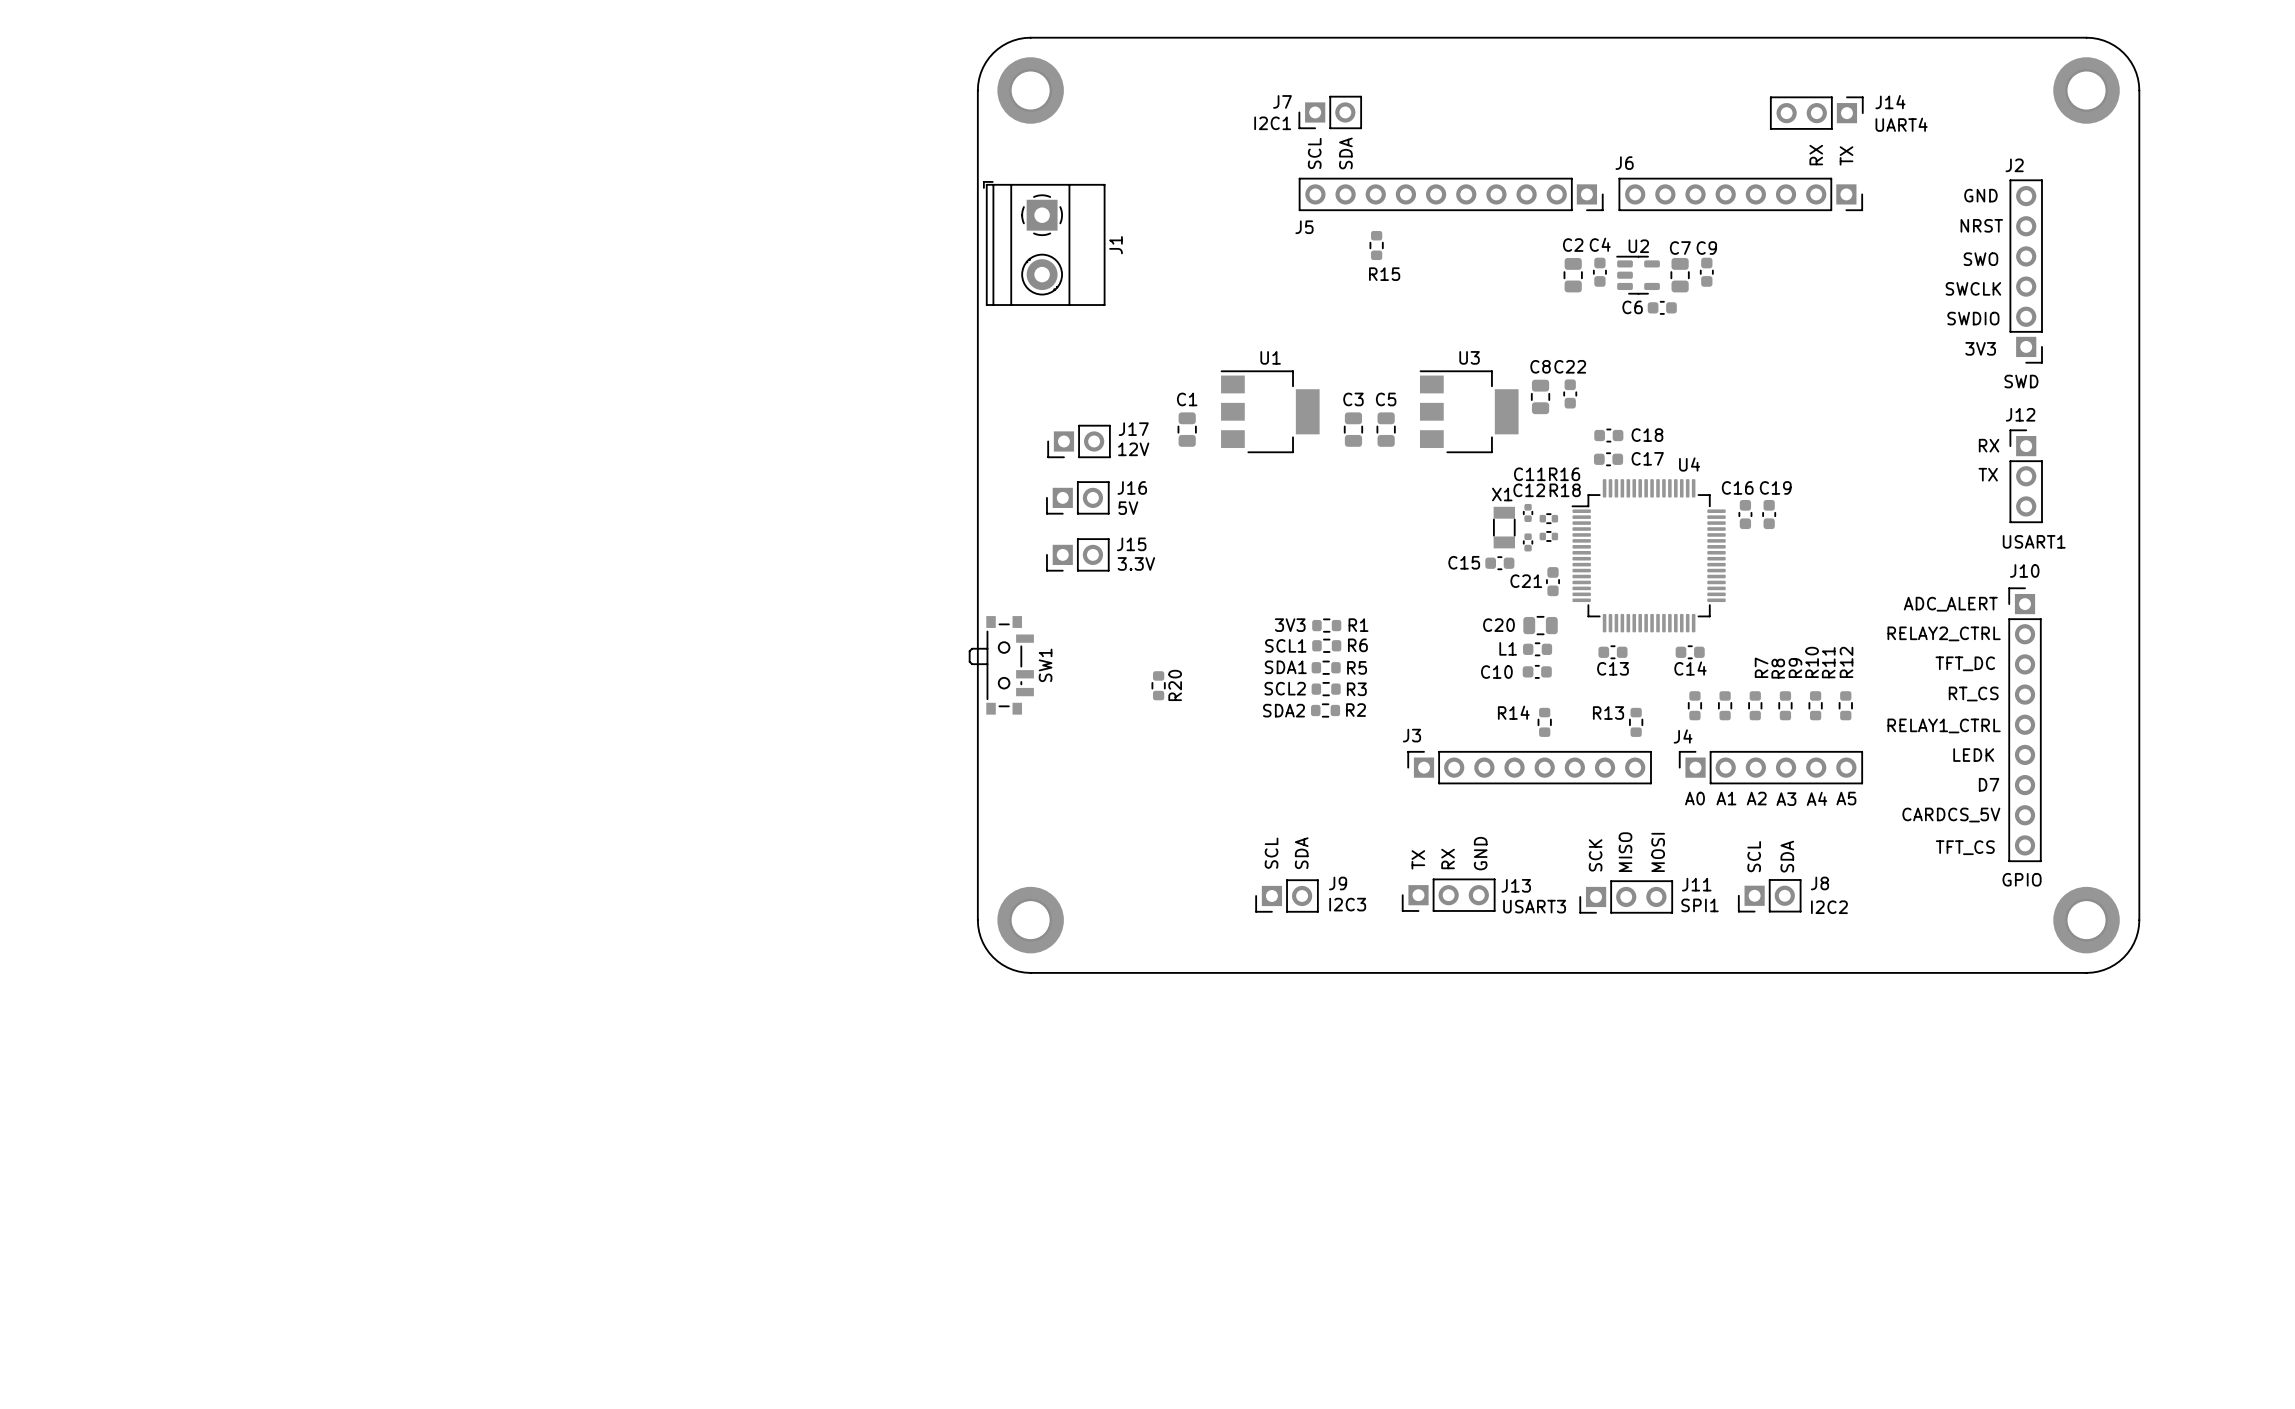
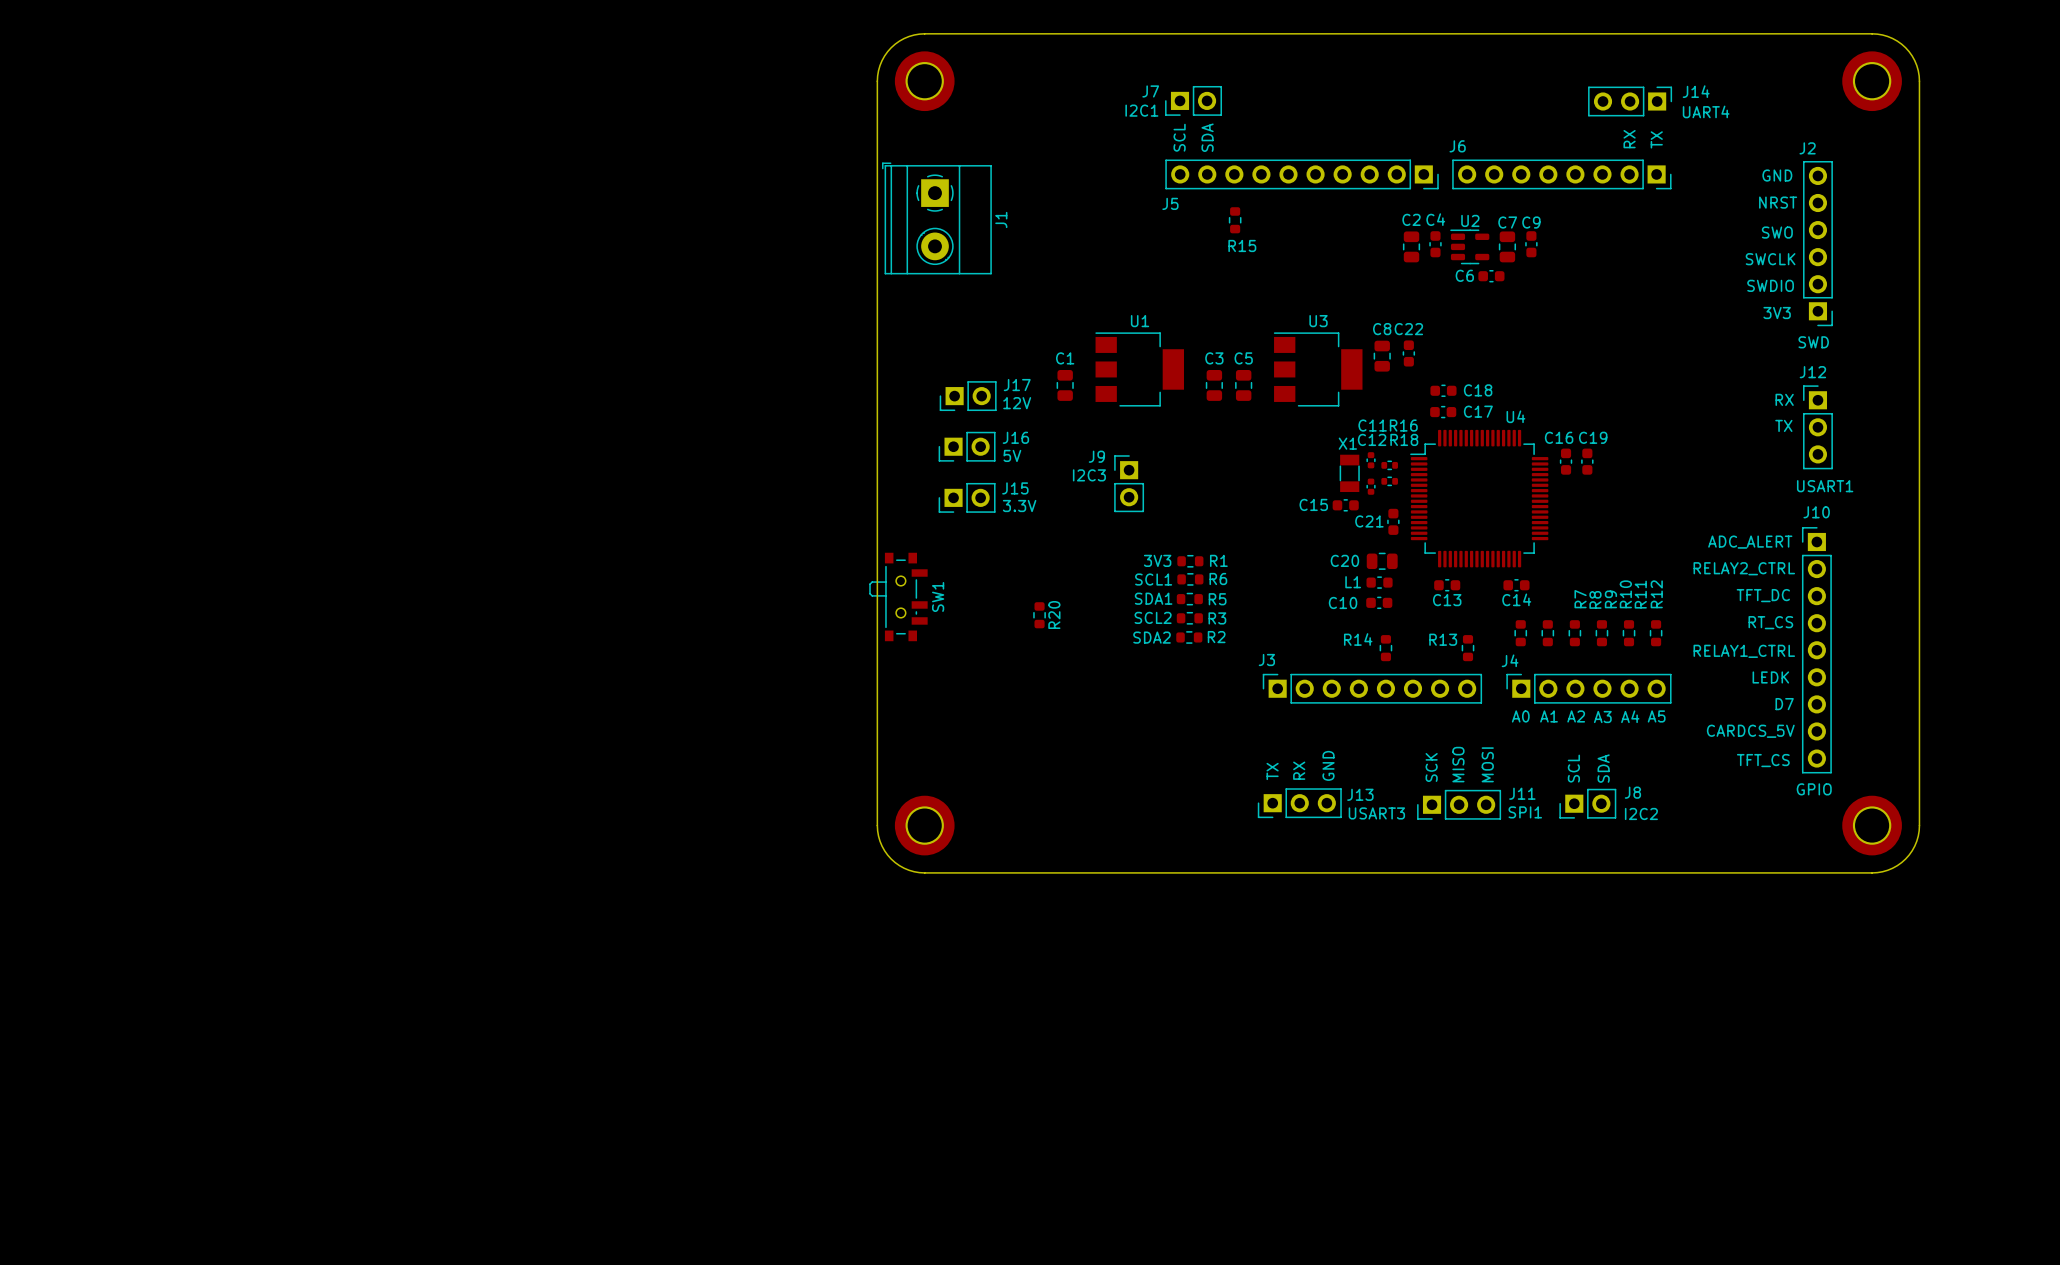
J9 footprint: [1255, 879, 1319, 913] -> [1114, 455, 1144, 513]
J9 name position: J9 (1338, 883) -> J9 (1096, 456)
J9 value position: I2C3 (1347, 904) -> I2C3 (1089, 475)

